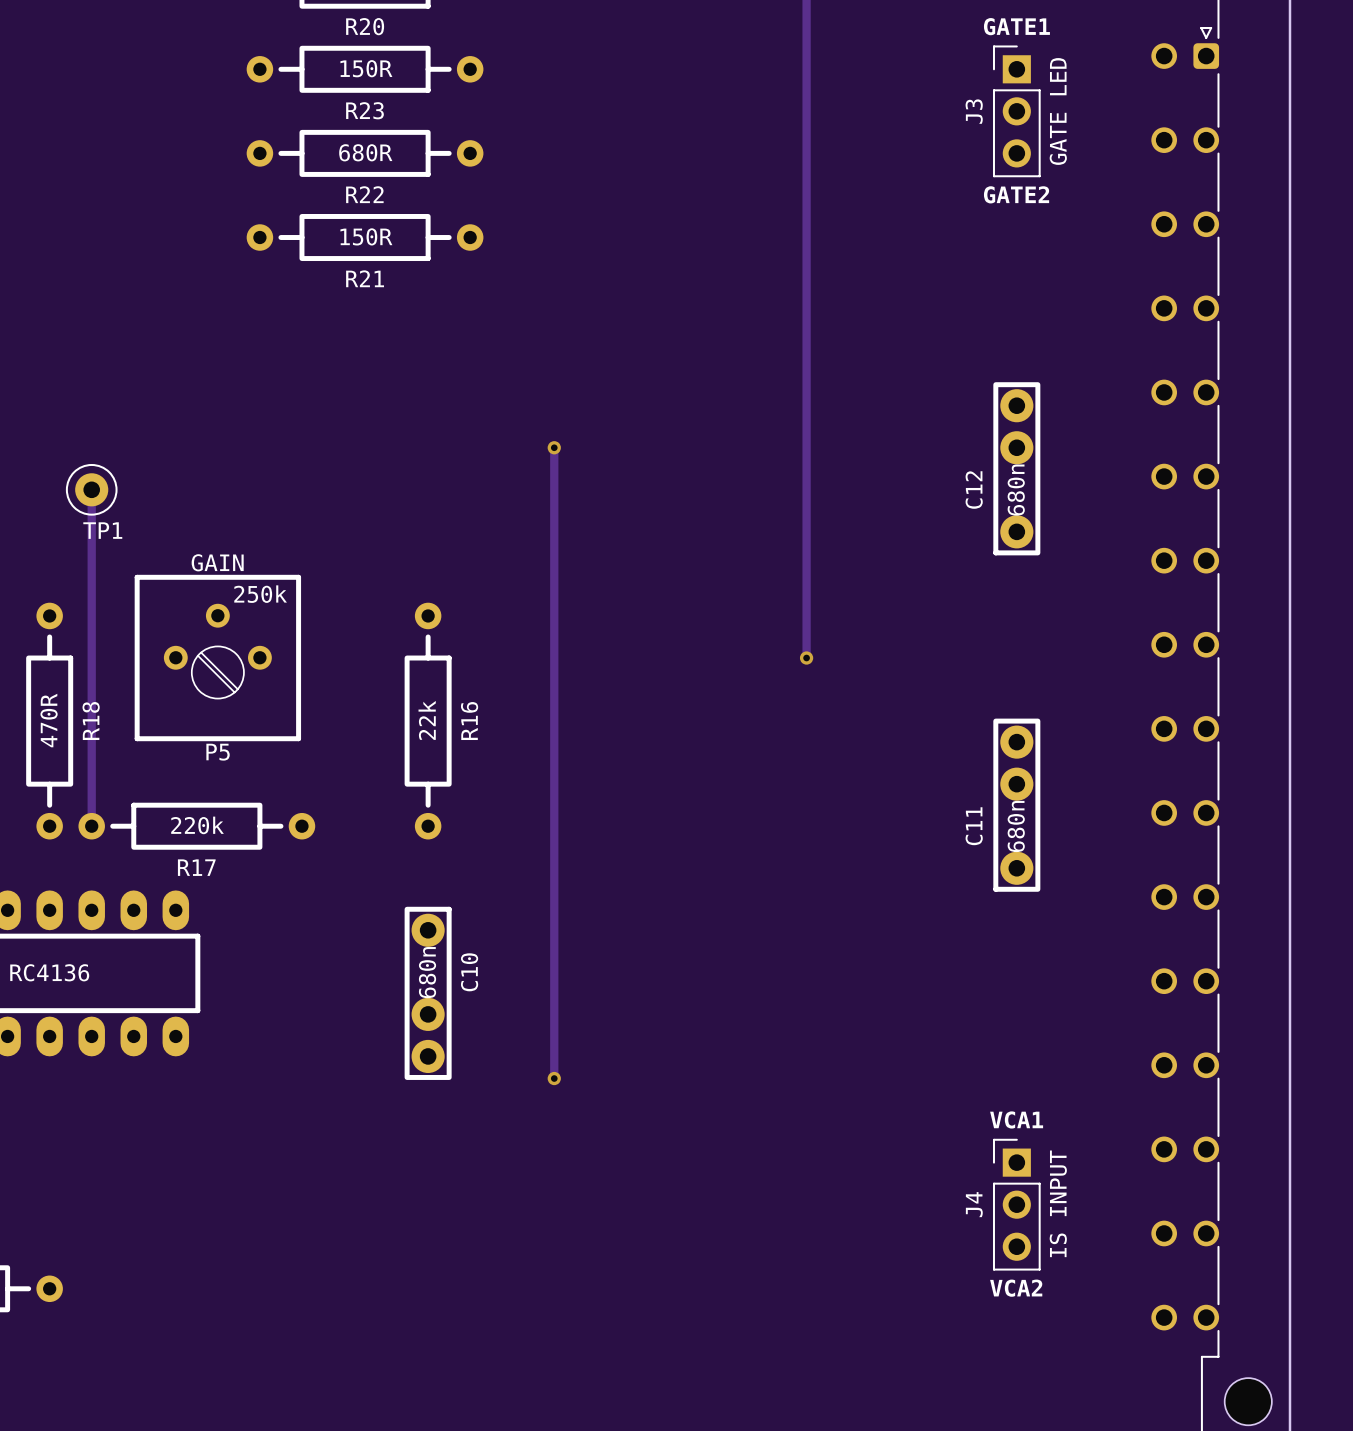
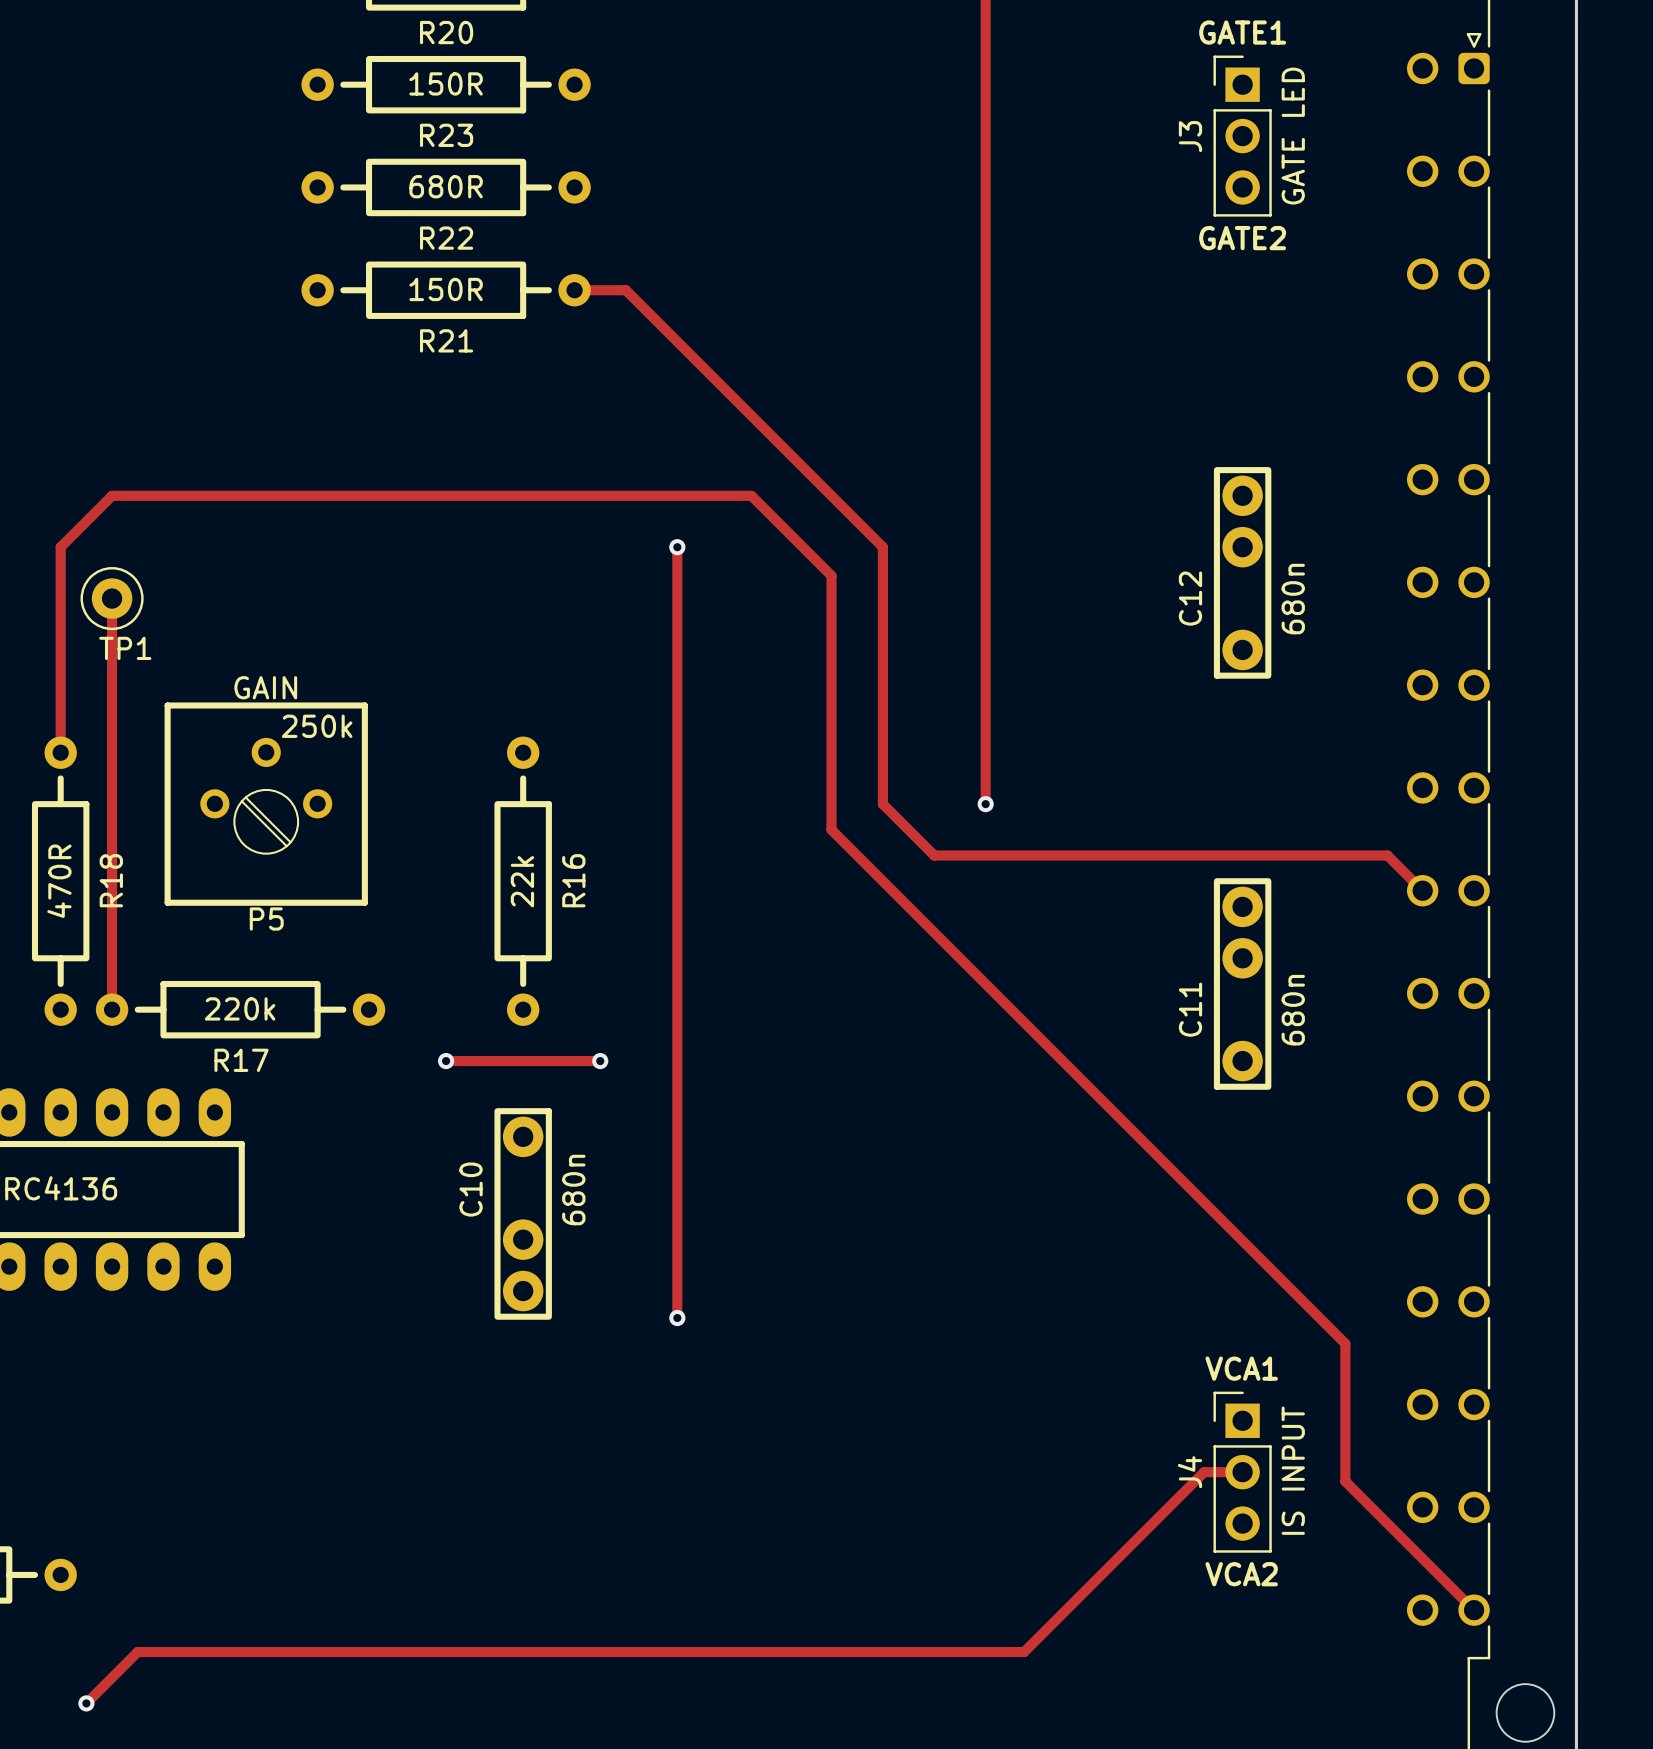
track: none -> (574, 290) (625, 290) (882, 547) (882, 804) (934, 855) (1387, 855) (1422, 890)
C12 value position: 680n (1016, 490) -> 680n (1293, 599)
track: none -> (60, 752) (60, 547) (112, 495) (751, 495) (831, 575) (831, 829) (1345, 1343) (1345, 1481) (1474, 1610)
C11 value position: 680n (1016, 826) -> 680n (1293, 1010)
track: none -> (446, 1061) (600, 1061)
via: none -> (446, 1061)
via: none -> (600, 1061)
C10 value position: 680n (427, 972) -> 680n (573, 1190)
C10 name position: C10 (469, 972) -> C10 (471, 1189)
track: none -> (1242, 1472) (1204, 1472) (1024, 1652) (137, 1652) (86, 1703)
via: none -> (86, 1703)

